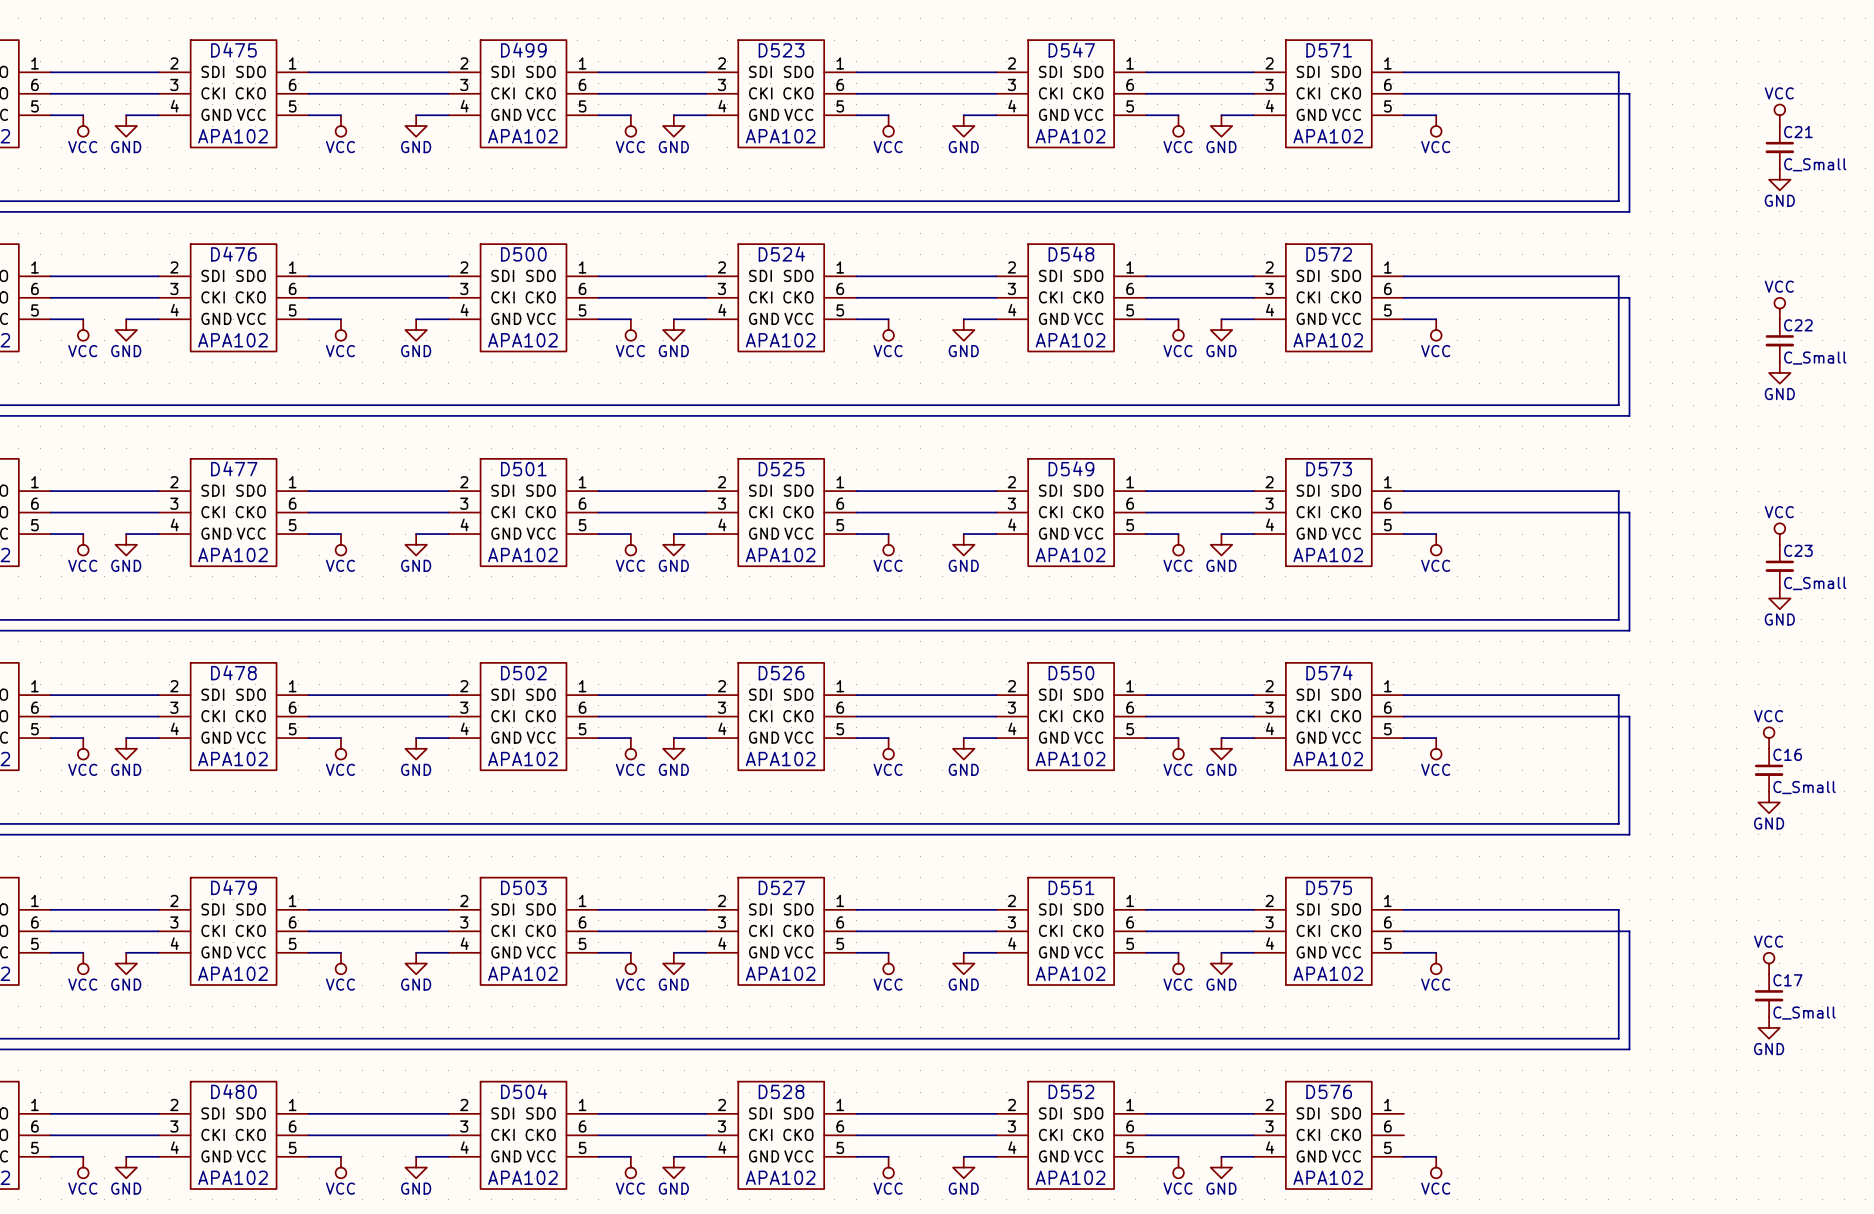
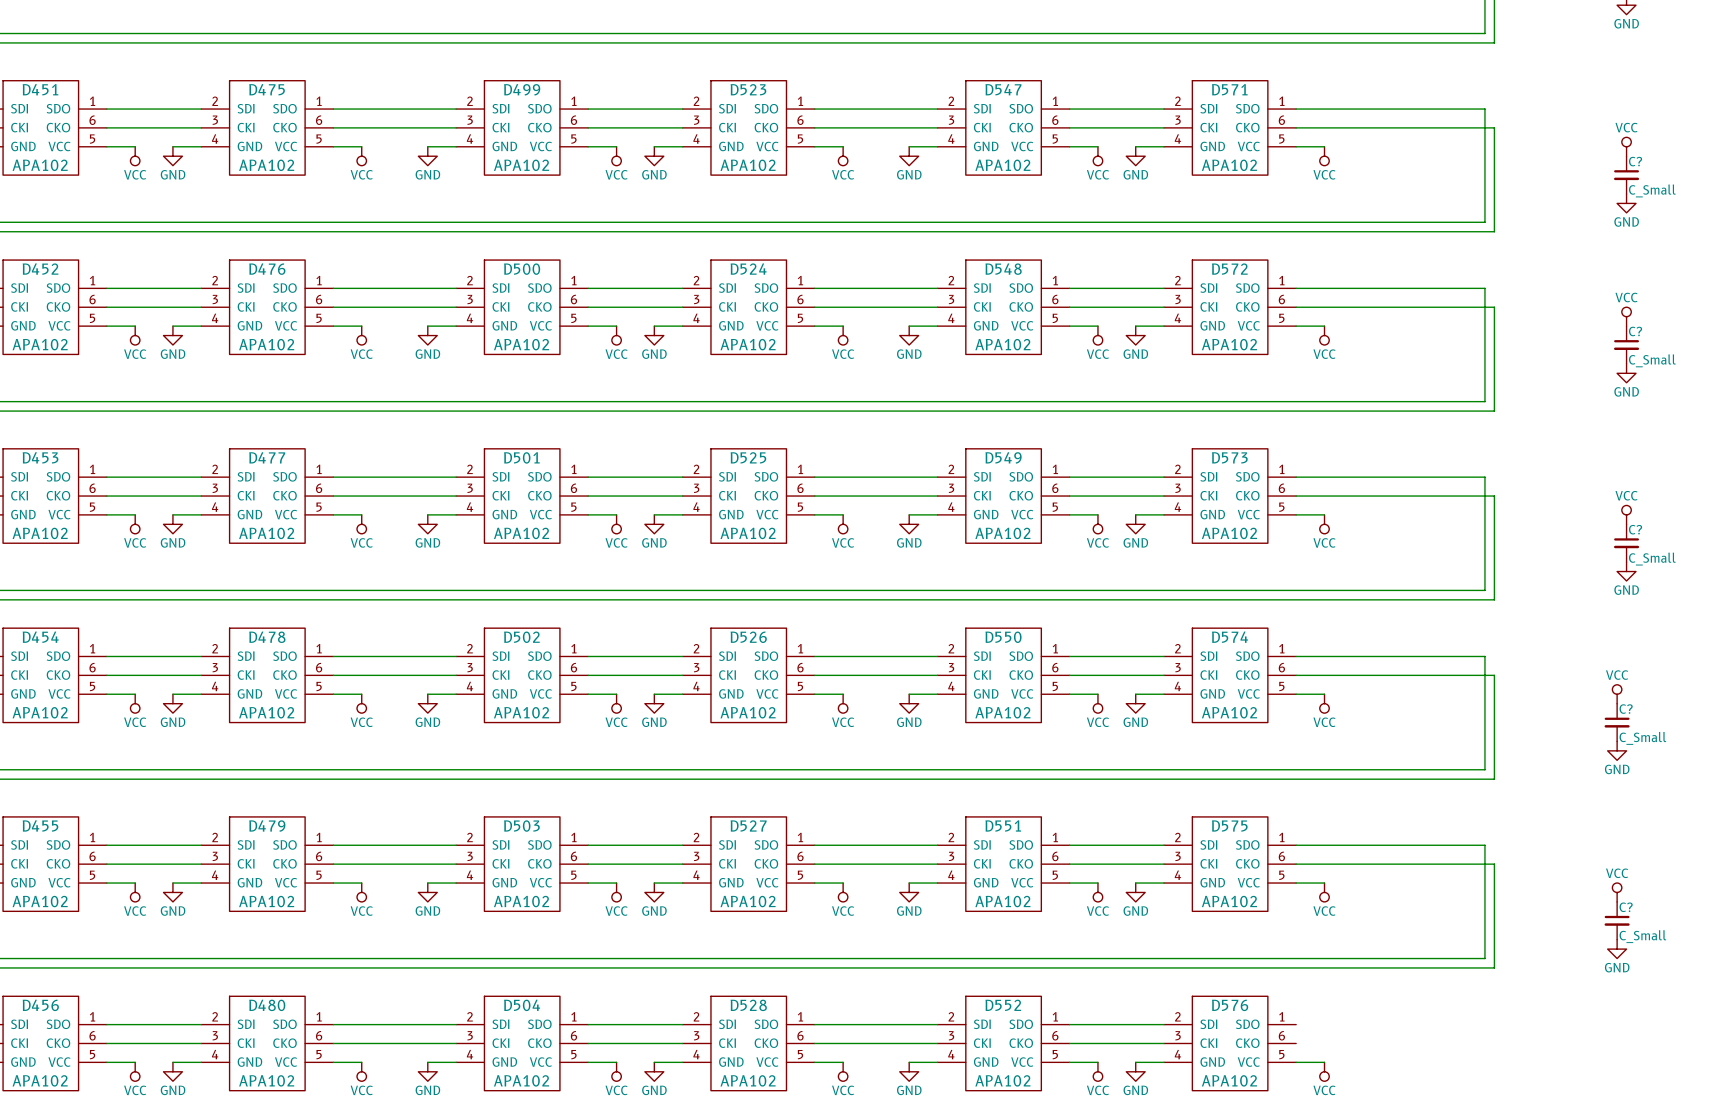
C21 name: C21 (1798, 132) -> C? (1635, 161)
C22 name: C22 (1798, 325) -> C? (1635, 331)
C23 name: C23 (1798, 550) -> C? (1635, 529)
C16 name: C16 (1787, 754) -> C? (1626, 709)
C17 name: C17 (1787, 980) -> C? (1626, 907)

